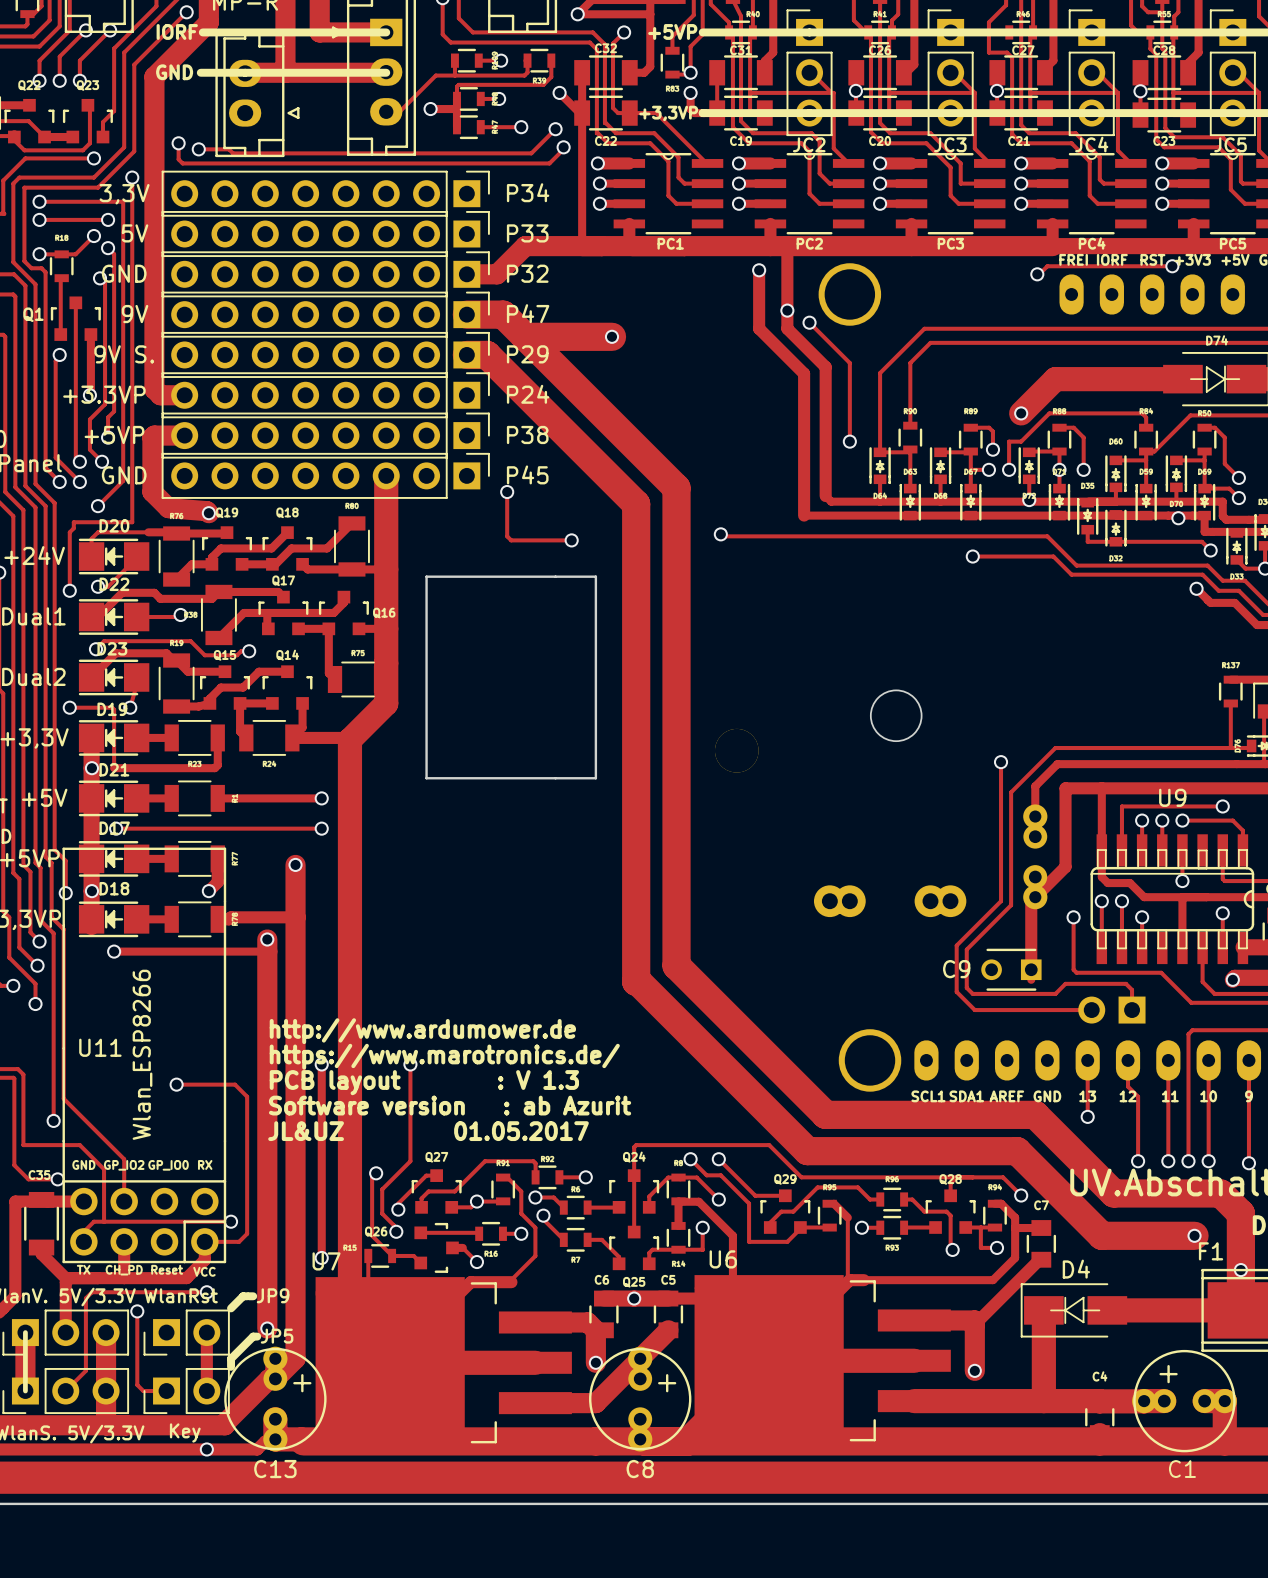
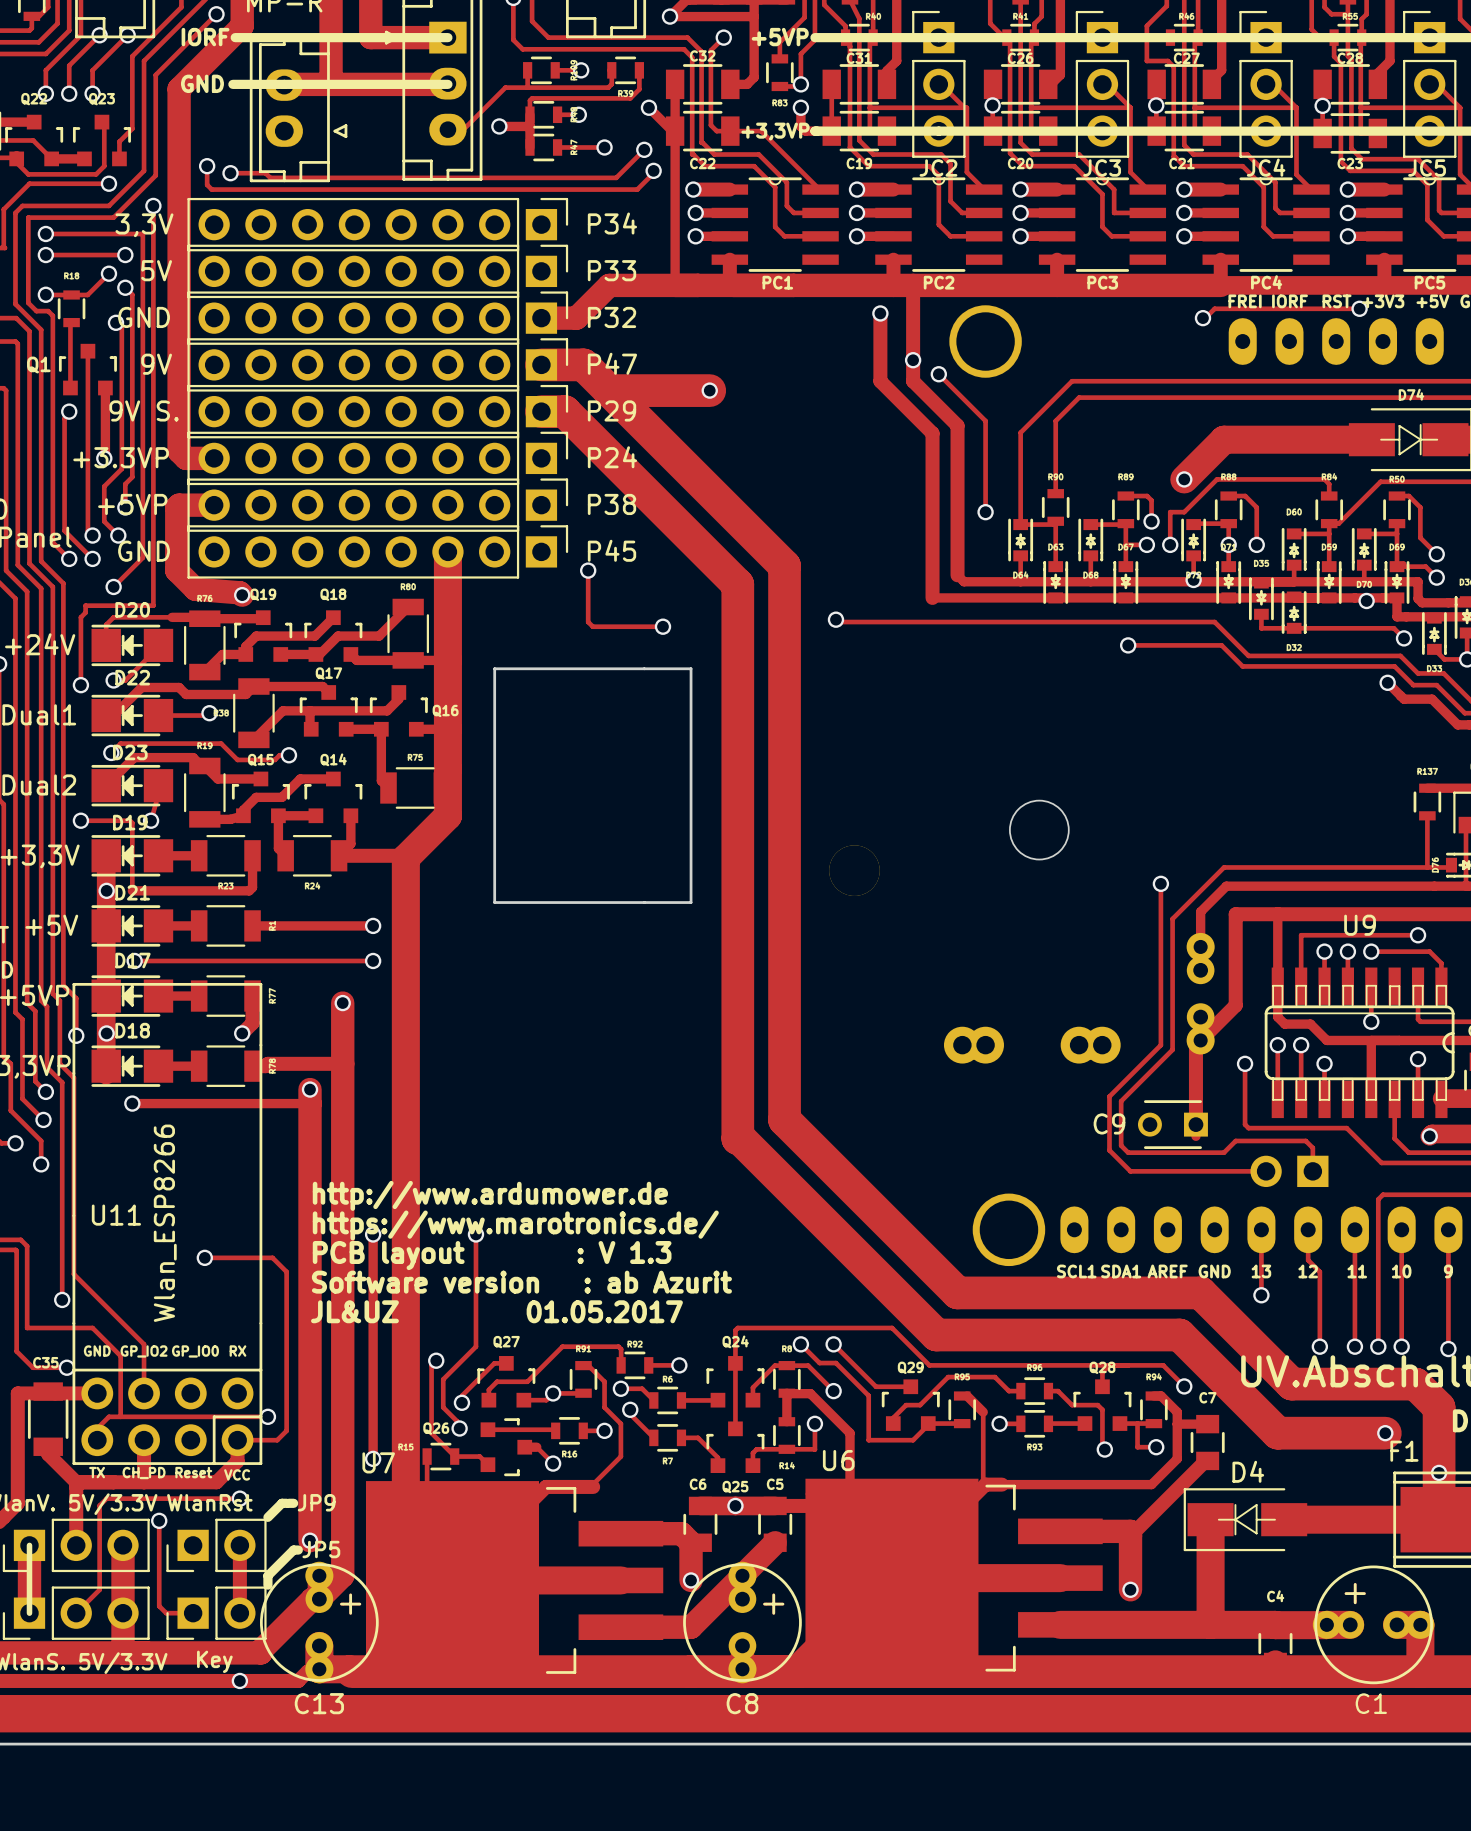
C13 footprint: [224, 1346, 327, 1452] -> [260, 1561, 379, 1684]
C8 footprint: [589, 1346, 692, 1452] -> [683, 1561, 802, 1684]
C1 footprint: [1132, 1349, 1237, 1453] -> [1312, 1565, 1435, 1685]

